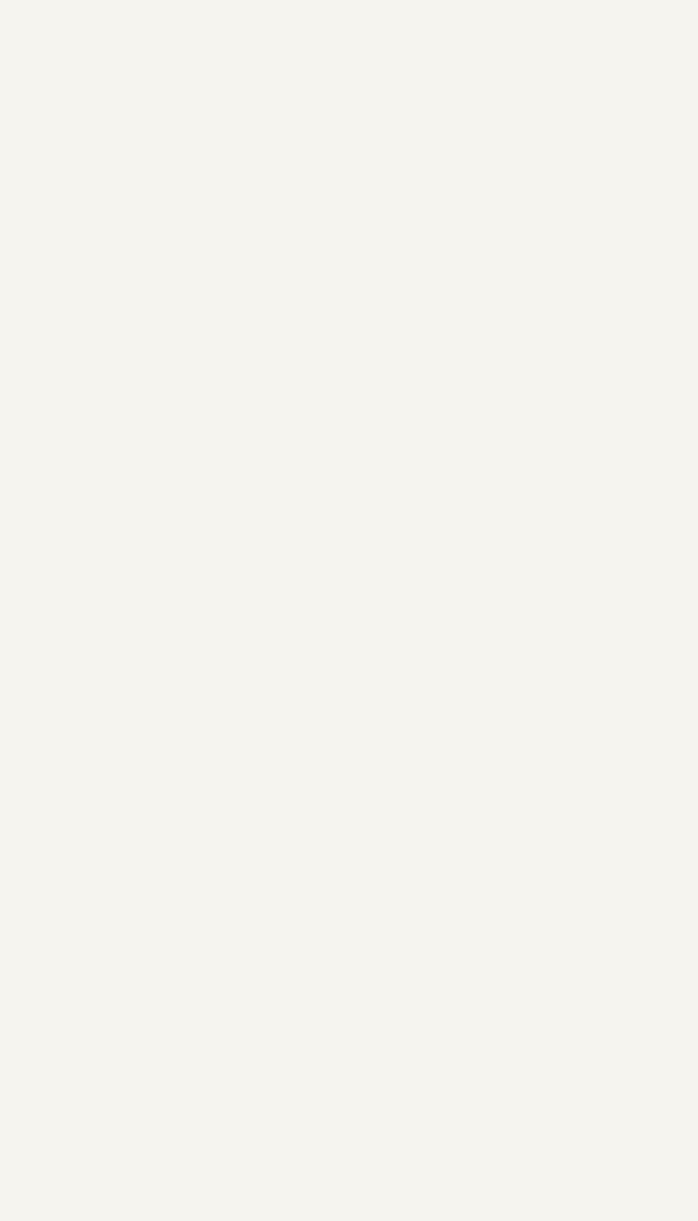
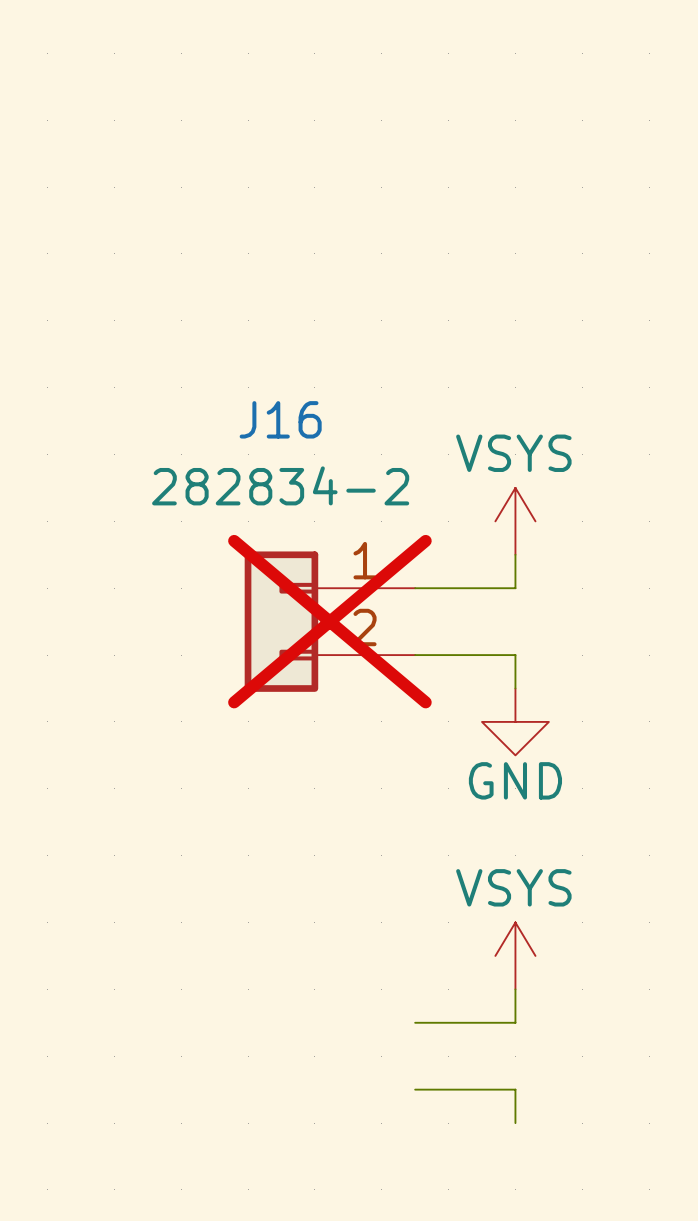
power symbol: none -> VSYS (515, 521)
wire: none -> (515, 554) (515, 588) (415, 588)
J16: none -> 282834-2 (329, 621)
wire: none -> (415, 655) (515, 655) (515, 688)
power symbol: none -> GND (515, 721)
power symbol: none -> VSYS (515, 955)
wire: none -> (515, 989) (515, 1022) (415, 1022)
wire: none -> (415, 1089) (515, 1089) (515, 1123)

